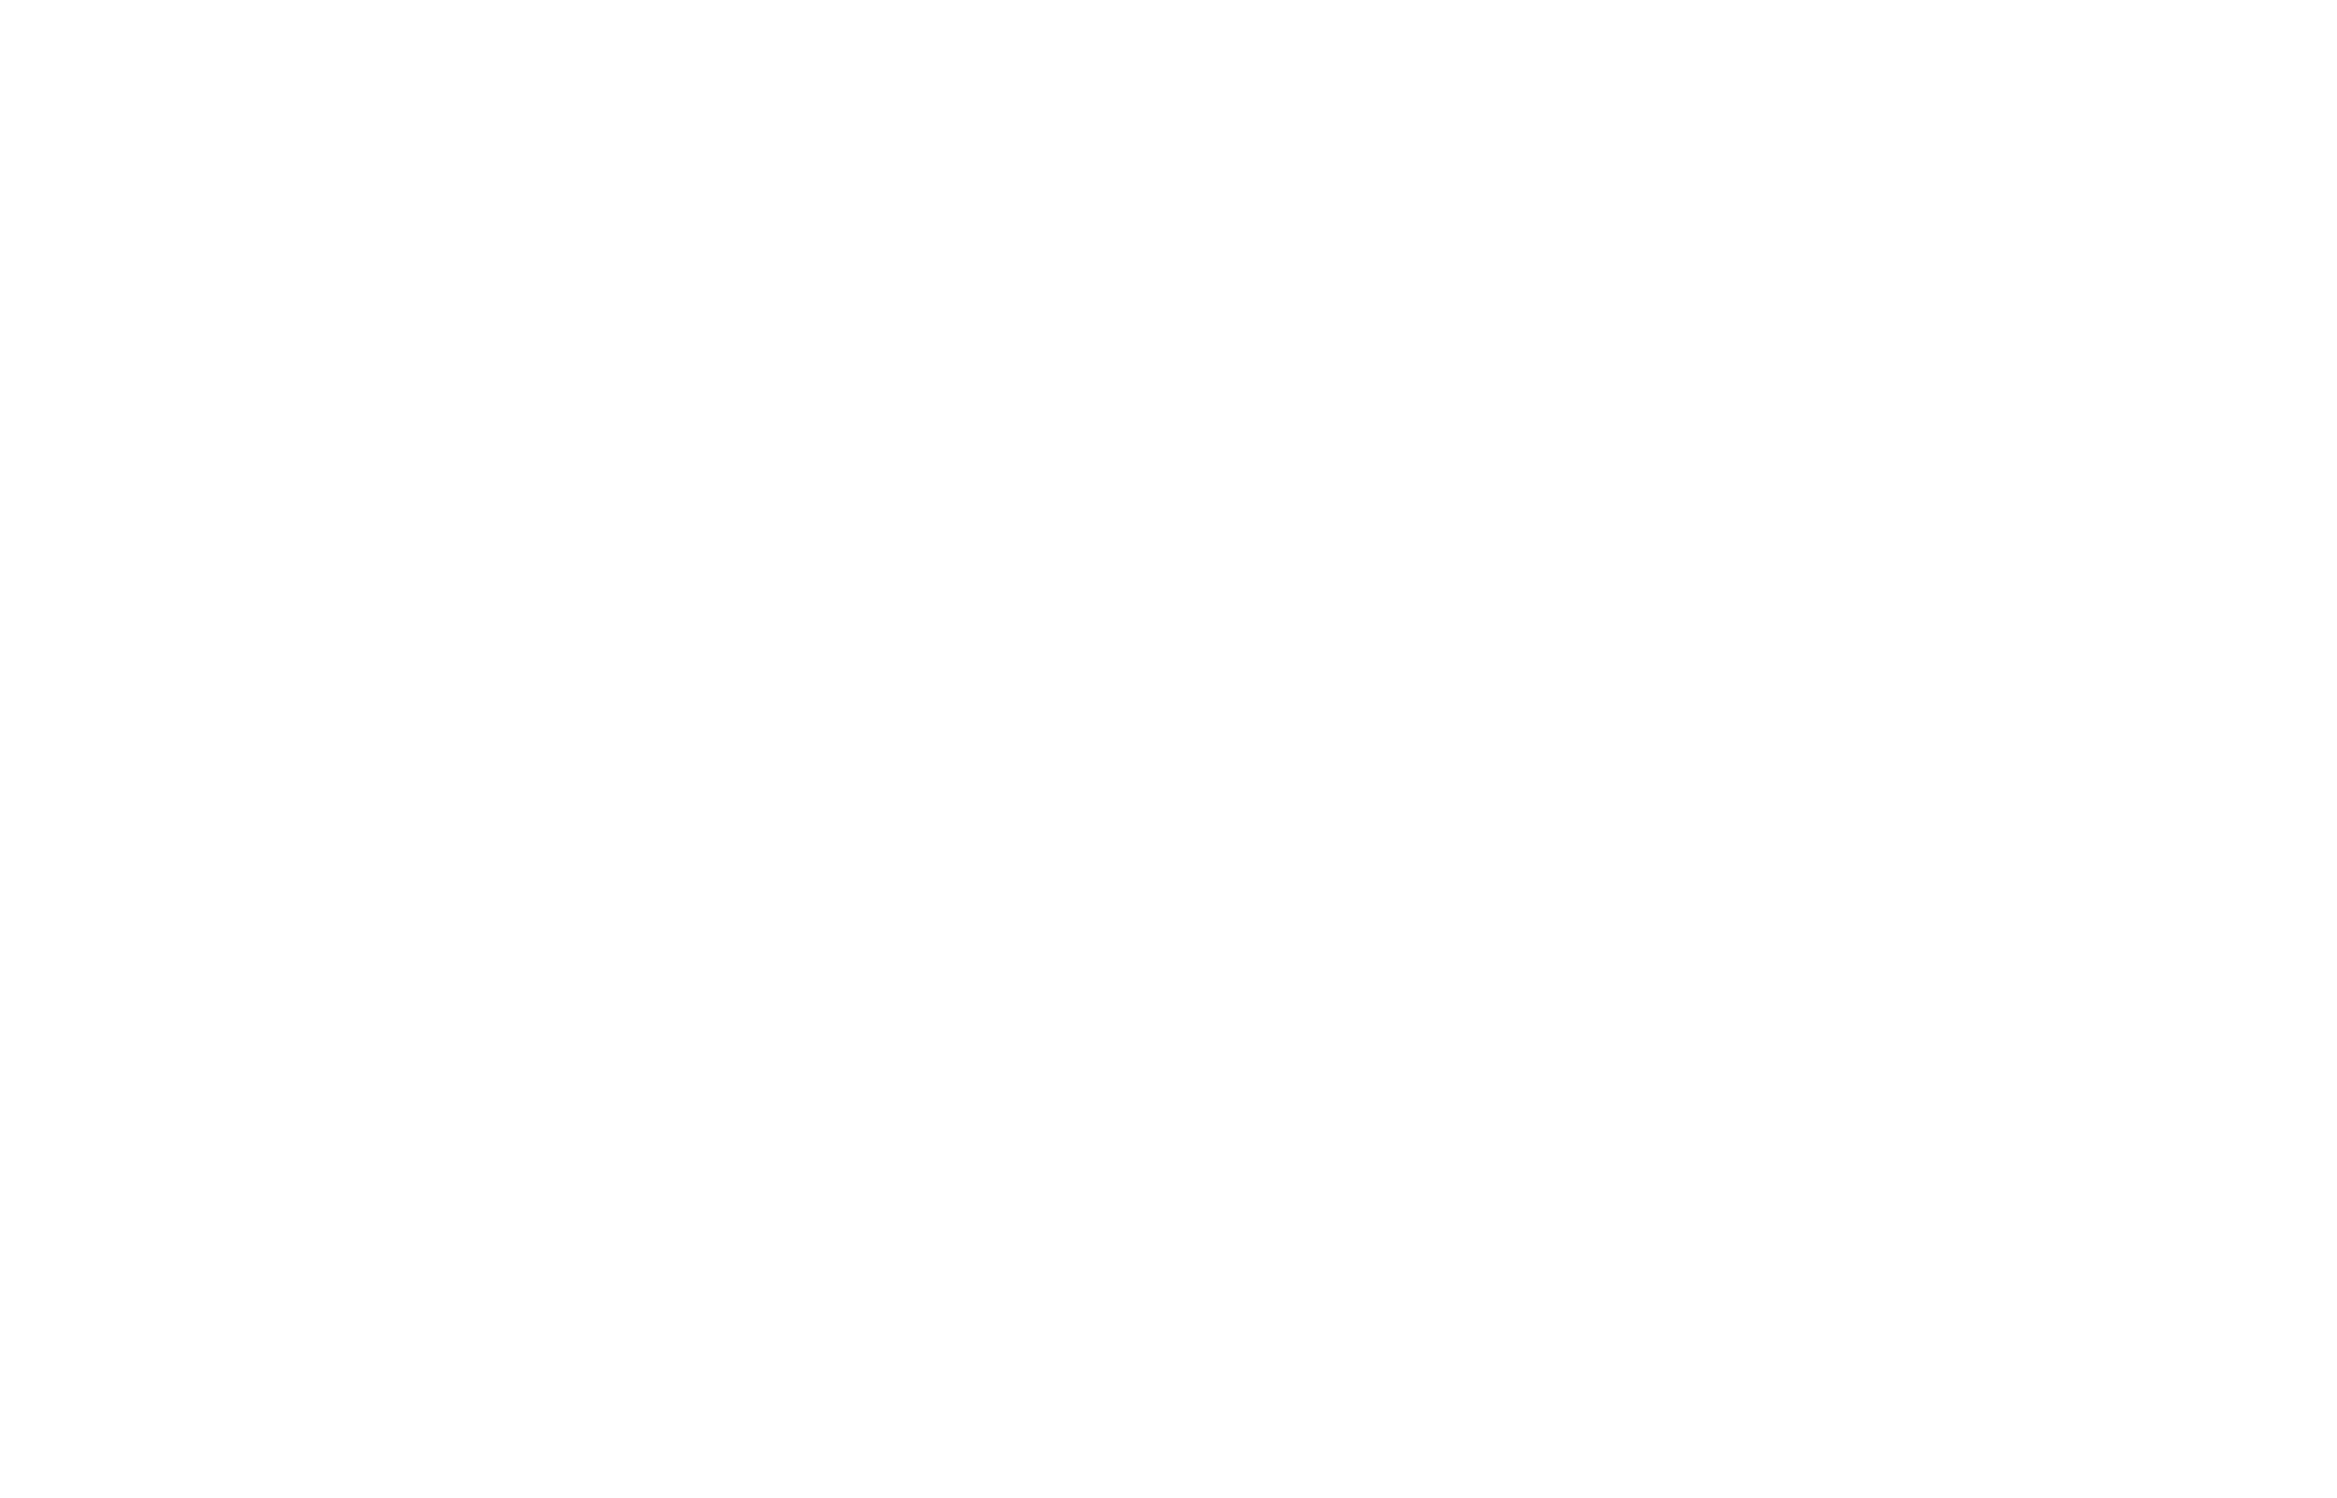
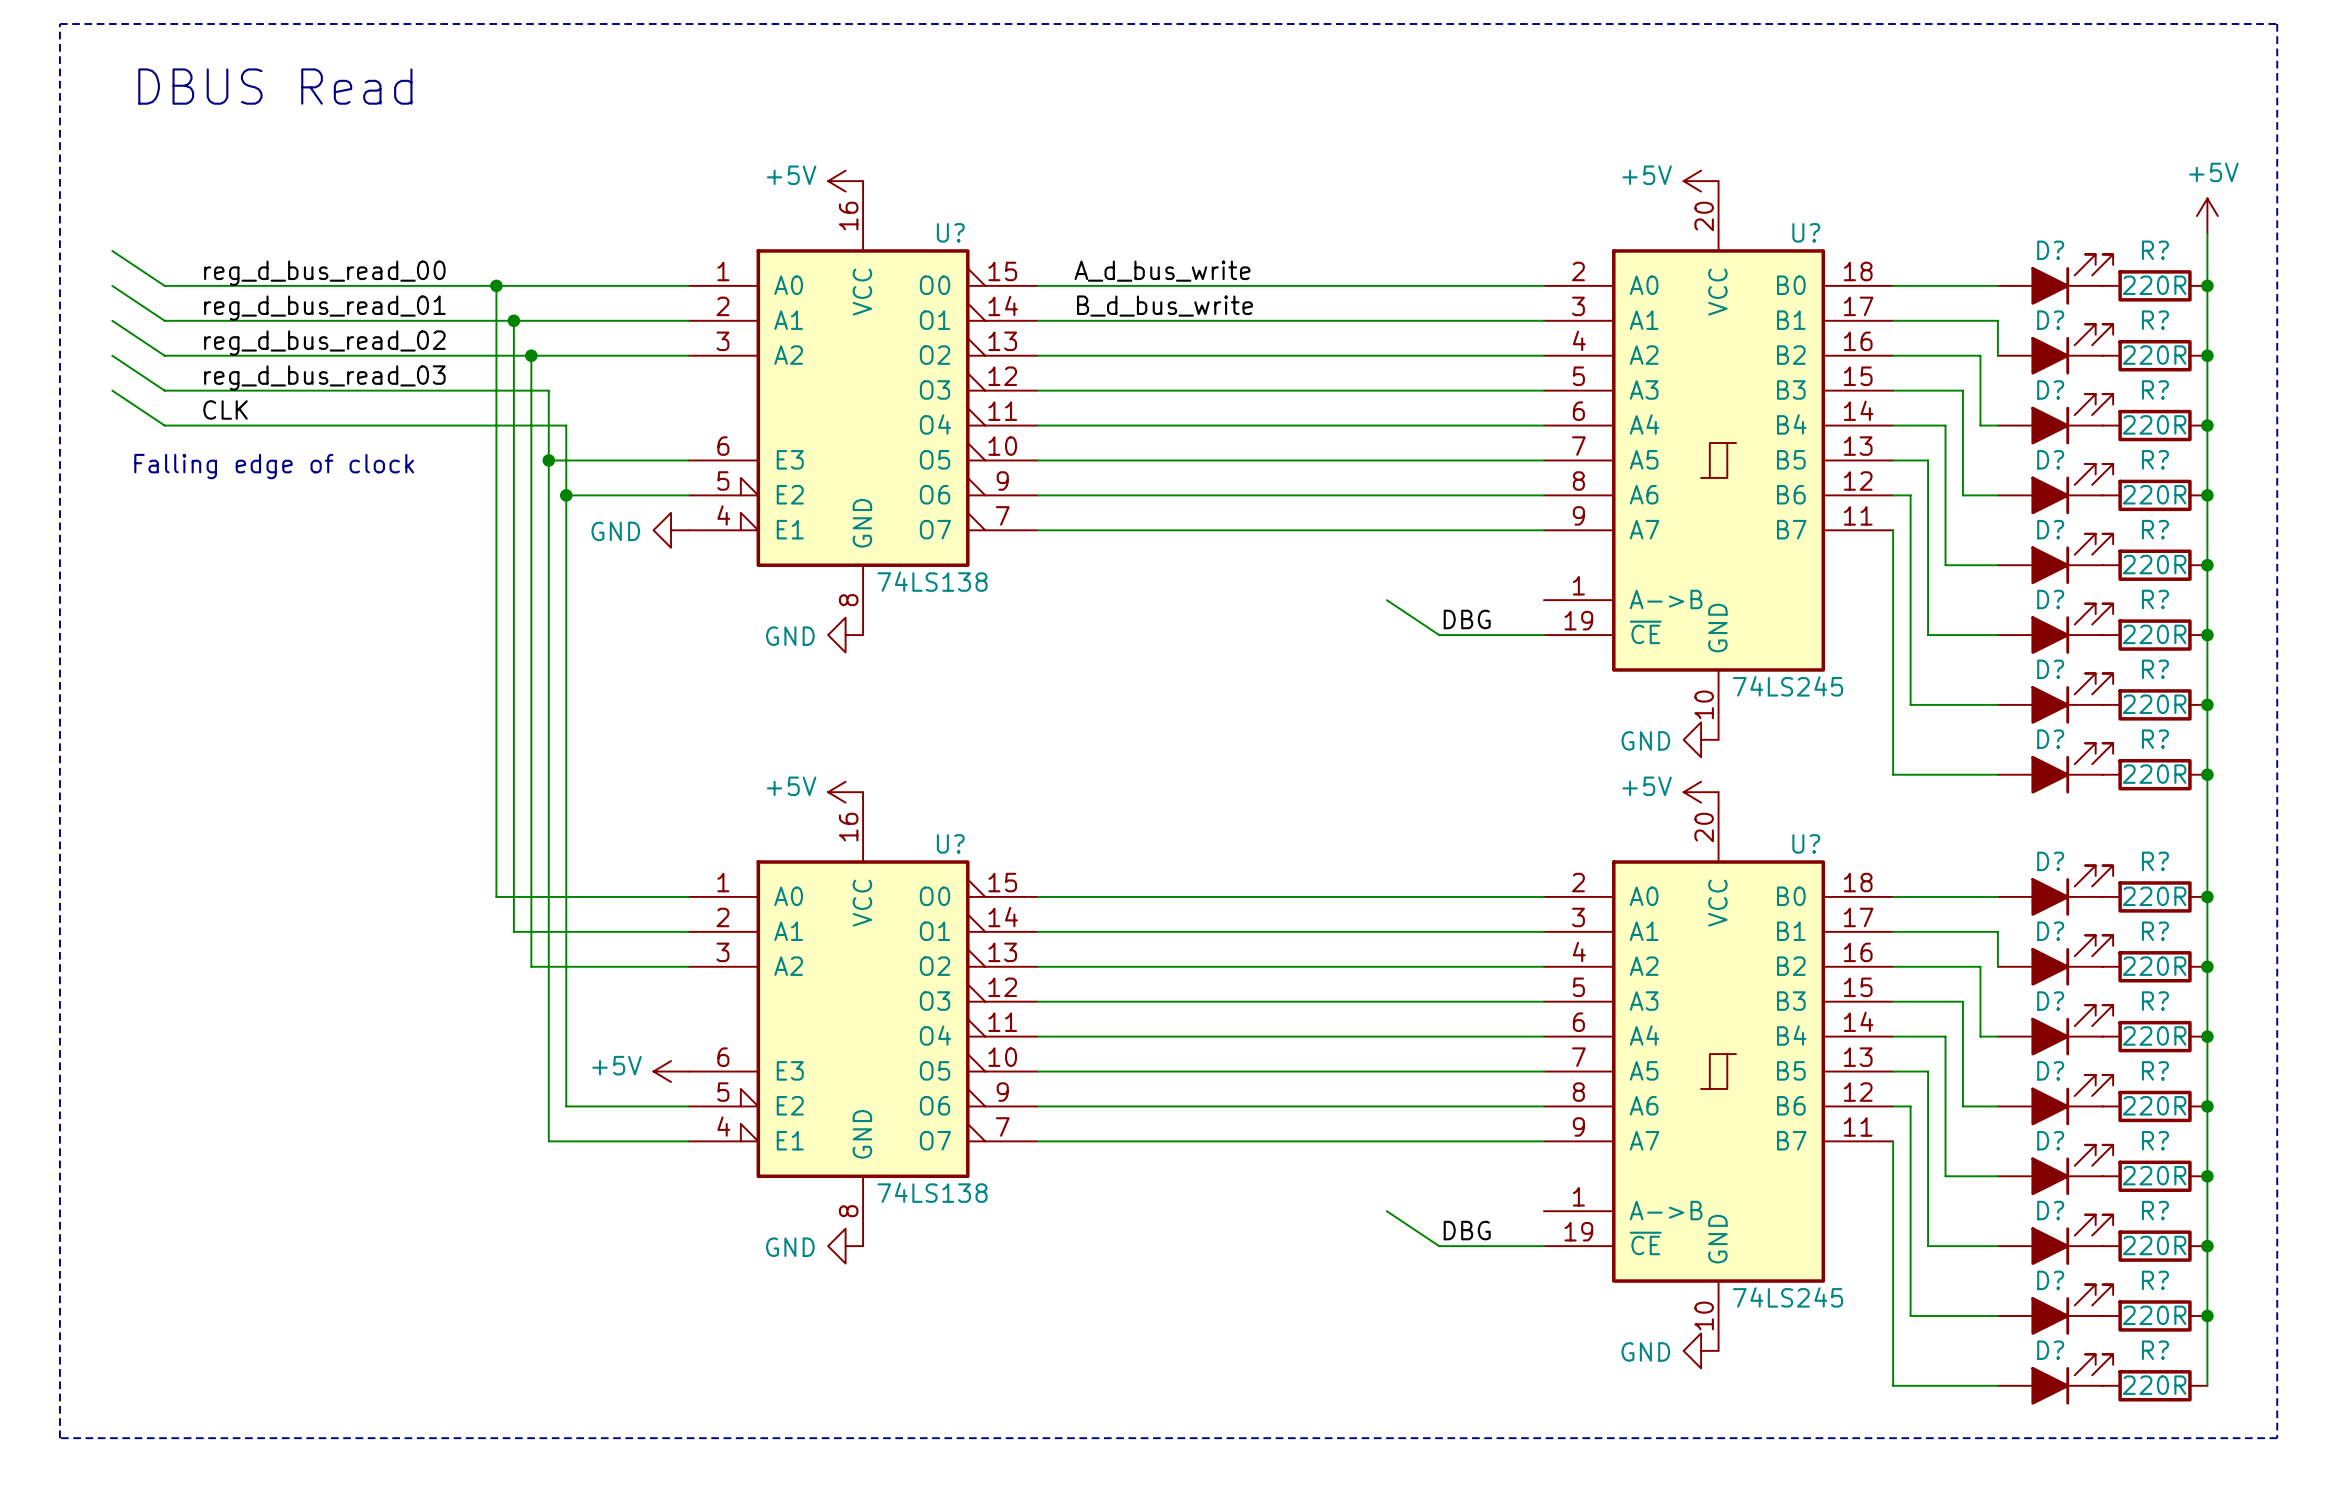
line: none -> (59, 24) (2277, 24) (2277, 1438) (59, 1438) (59, 24)
text: none -> DBUS Read (275, 86)
power symbol: none -> +5V (845, 181)
power symbol: none -> +5V (1701, 181)
power symbol: none -> +5V (2207, 216)
wire: none -> (2207, 233) (2207, 1385)
wire: none -> (112, 250) (164, 285) (688, 285)
label: none -> A_d_bus_write (1162, 271)
label: none -> reg_d_bus_read_00 (324, 273)
D?: none -> (2055, 279)
wire: none -> (112, 285) (164, 320) (688, 320)
wire: none -> (496, 285) (496, 896) (688, 896)
junction: none -> (496, 285)
wire: none -> (1037, 285) (1543, 285)
wire: none -> (1893, 285) (1997, 285)
R?: none -> 220R (2155, 285)
junction: none -> (2207, 285)
label: none -> B_d_bus_write (1164, 306)
label: none -> reg_d_bus_read_01 (324, 308)
wire: none -> (112, 320) (164, 355) (688, 355)
wire: none -> (513, 320) (513, 931) (688, 931)
junction: none -> (513, 320)
wire: none -> (1037, 320) (1543, 320)
wire: none -> (1893, 320) (1997, 320) (1997, 355)
label: none -> reg_d_bus_read_02 (324, 343)
D?: none -> (2055, 349)
wire: none -> (112, 355) (164, 390) (548, 390) (548, 1141) (688, 1141)
wire: none -> (531, 355) (531, 966) (688, 966)
junction: none -> (531, 355)
wire: none -> (1037, 355) (1543, 355)
wire: none -> (1893, 355) (1980, 355) (1980, 425) (1997, 425)
R?: none -> 220R (2155, 355)
junction: none -> (2207, 355)
label: none -> reg_d_bus_read_03 (324, 377)
wire: none -> (112, 390) (164, 425) (566, 425) (566, 1106) (688, 1106)
wire: none -> (1037, 390) (1543, 390)
wire: none -> (1893, 390) (1962, 390) (1962, 495) (1997, 495)
U?: none -> 74LS138 (863, 408)
label: none -> CLK (225, 409)
D?: none -> (2055, 419)
wire: none -> (1037, 425) (1543, 425)
wire: none -> (1893, 425) (1945, 425) (1945, 565) (1997, 565)
R?: none -> 220R (2155, 425)
junction: none -> (2207, 425)
wire: none -> (548, 460) (688, 460)
junction: none -> (548, 460)
wire: none -> (1037, 460) (1543, 460)
U?: none -> 74LS245 (1718, 460)
wire: none -> (1893, 460) (1928, 460) (1928, 635) (1997, 635)
text: none -> Falling edge of clock (274, 466)
D?: none -> (2055, 489)
wire: none -> (566, 495) (688, 495)
junction: none -> (566, 495)
wire: none -> (1037, 495) (1543, 495)
wire: none -> (1893, 495) (1910, 495) (1910, 704) (1997, 704)
R?: none -> 220R (2155, 495)
junction: none -> (2207, 495)
power symbol: none -> GND (671, 530)
wire: none -> (1037, 530) (1543, 530)
wire: none -> (1893, 530) (1893, 774) (1997, 774)
D?: none -> (2055, 558)
R?: none -> 220R (2155, 565)
junction: none -> (2207, 565)
wire: none -> (1386, 600) (1439, 635) (1543, 635)
label: none -> DBG (1467, 619)
D?: none -> (2055, 628)
power symbol: none -> GND (845, 635)
R?: none -> 220R (2155, 635)
junction: none -> (2207, 635)
D?: none -> (2055, 698)
R?: none -> 220R (2155, 704)
junction: none -> (2207, 704)
power symbol: none -> GND (1701, 739)
D?: none -> (2055, 768)
R?: none -> 220R (2155, 774)
junction: none -> (2207, 774)
power symbol: none -> +5V (845, 792)
power symbol: none -> +5V (1701, 792)
D?: none -> (2055, 890)
wire: none -> (1037, 896) (1543, 896)
wire: none -> (1893, 896) (1997, 896)
R?: none -> 220R (2155, 896)
junction: none -> (2207, 896)
wire: none -> (1037, 931) (1543, 931)
wire: none -> (1893, 931) (1997, 931) (1997, 966)
D?: none -> (2055, 960)
wire: none -> (1037, 966) (1543, 966)
wire: none -> (1893, 966) (1980, 966) (1980, 1036) (1997, 1036)
R?: none -> 220R (2155, 966)
junction: none -> (2207, 966)
wire: none -> (1037, 1001) (1543, 1001)
wire: none -> (1893, 1001) (1962, 1001) (1962, 1106) (1997, 1106)
U?: none -> 74LS138 (863, 1019)
D?: none -> (2055, 1030)
wire: none -> (1037, 1036) (1543, 1036)
wire: none -> (1893, 1036) (1945, 1036) (1945, 1176) (1997, 1176)
R?: none -> 220R (2155, 1036)
junction: none -> (2207, 1036)
power symbol: none -> +5V (671, 1071)
wire: none -> (1037, 1071) (1543, 1071)
U?: none -> 74LS245 (1718, 1071)
wire: none -> (1893, 1071) (1928, 1071) (1928, 1246) (1997, 1246)
D?: none -> (2055, 1100)
wire: none -> (1037, 1106) (1543, 1106)
wire: none -> (1893, 1106) (1910, 1106) (1910, 1315) (1997, 1315)
R?: none -> 220R (2155, 1106)
junction: none -> (2207, 1106)
wire: none -> (1037, 1141) (1543, 1141)
wire: none -> (1893, 1141) (1893, 1385) (1997, 1385)
D?: none -> (2055, 1170)
R?: none -> 220R (2155, 1176)
junction: none -> (2207, 1176)
wire: none -> (1386, 1211) (1439, 1246) (1543, 1246)
label: none -> DBG (1467, 1230)
D?: none -> (2055, 1239)
power symbol: none -> GND (845, 1246)
R?: none -> 220R (2155, 1246)
junction: none -> (2207, 1246)
D?: none -> (2055, 1309)
R?: none -> 220R (2155, 1315)
junction: none -> (2207, 1315)
power symbol: none -> GND (1701, 1350)
D?: none -> (2055, 1379)
R?: none -> 220R (2155, 1385)

